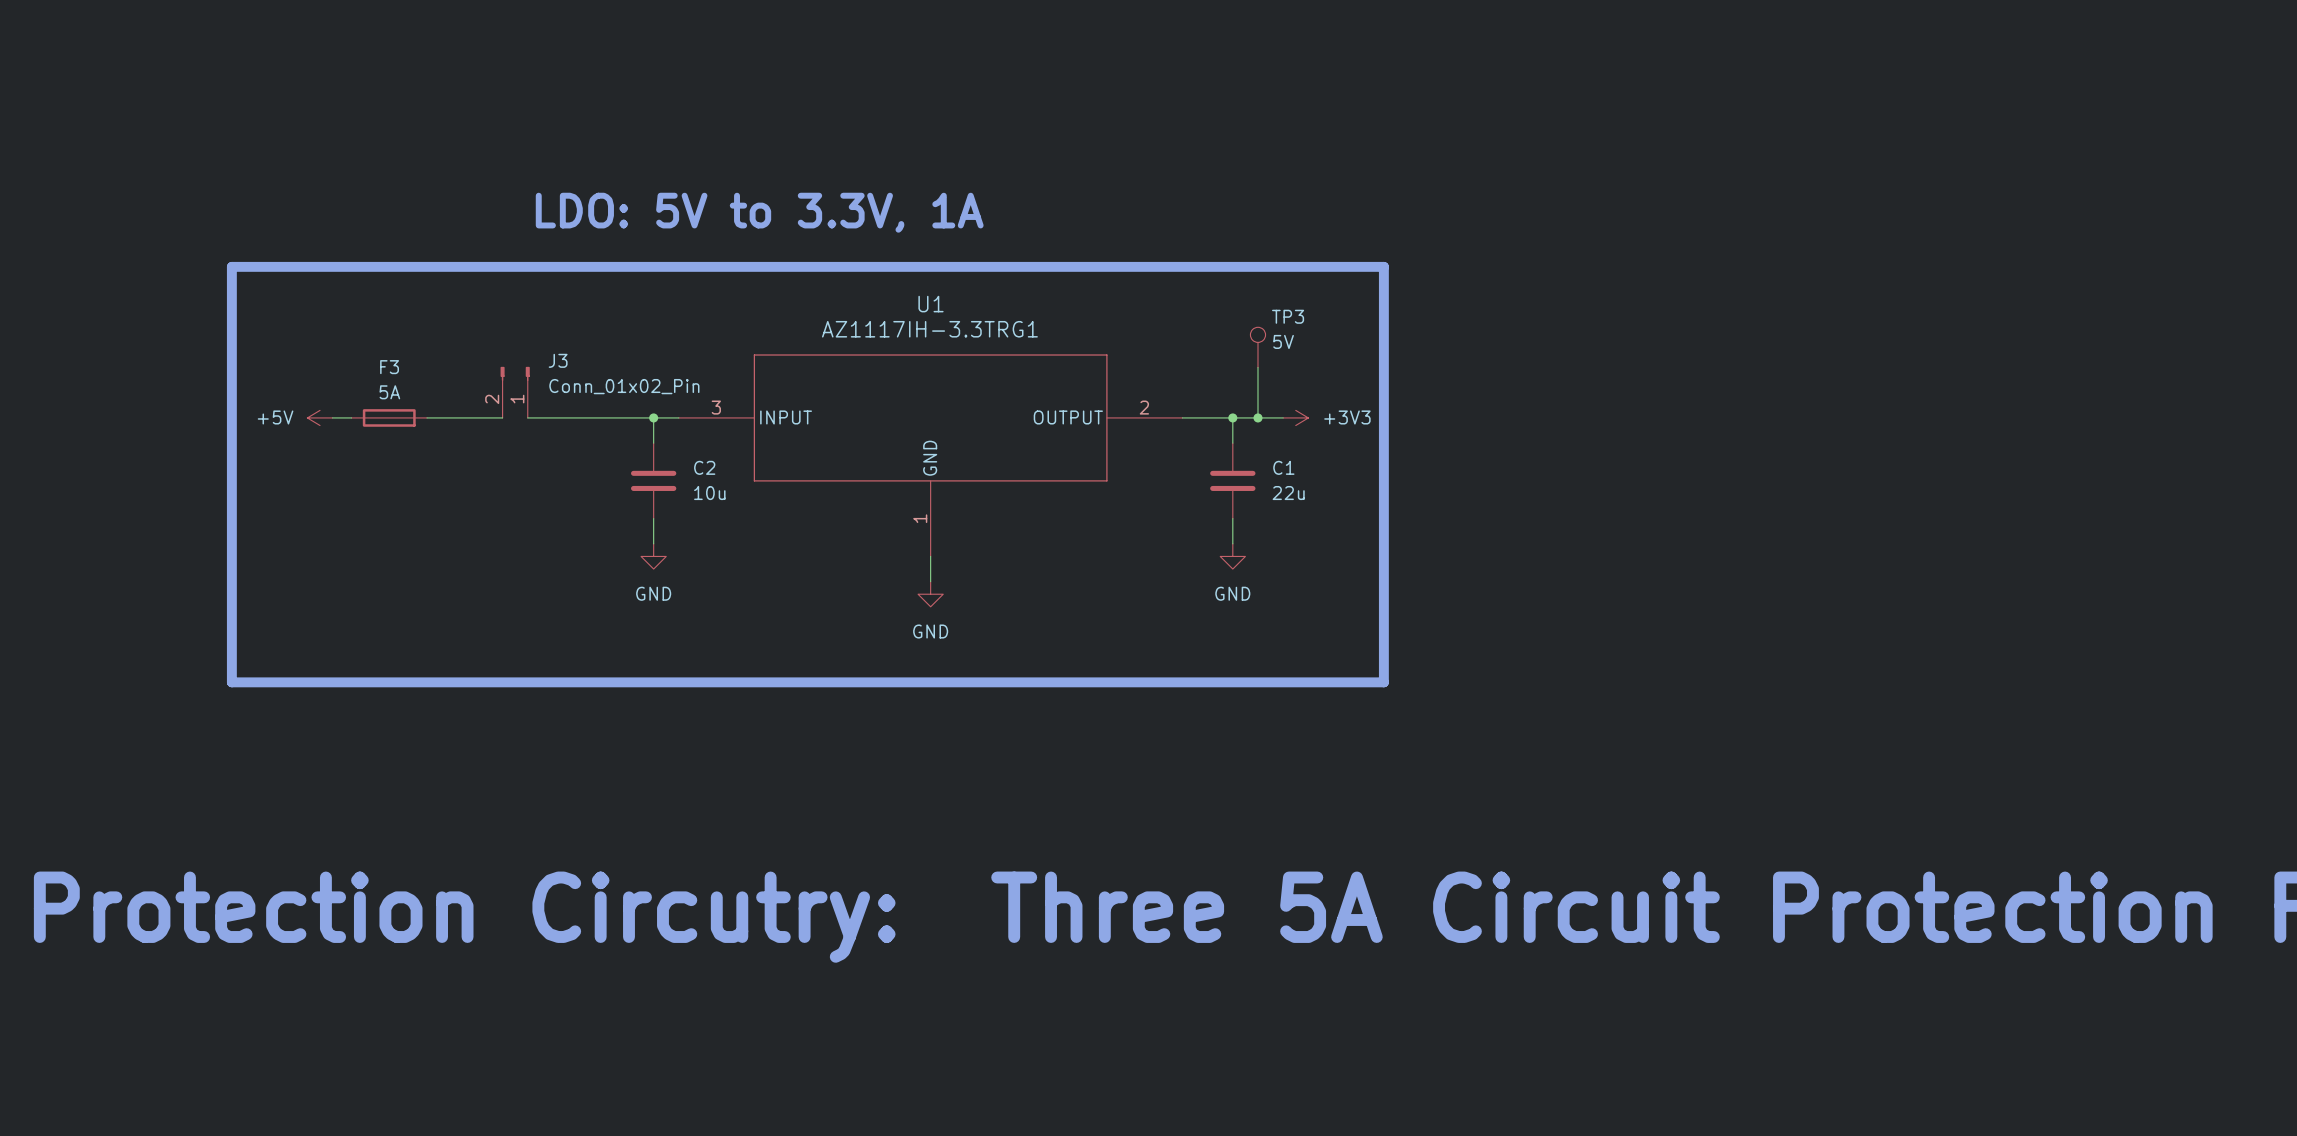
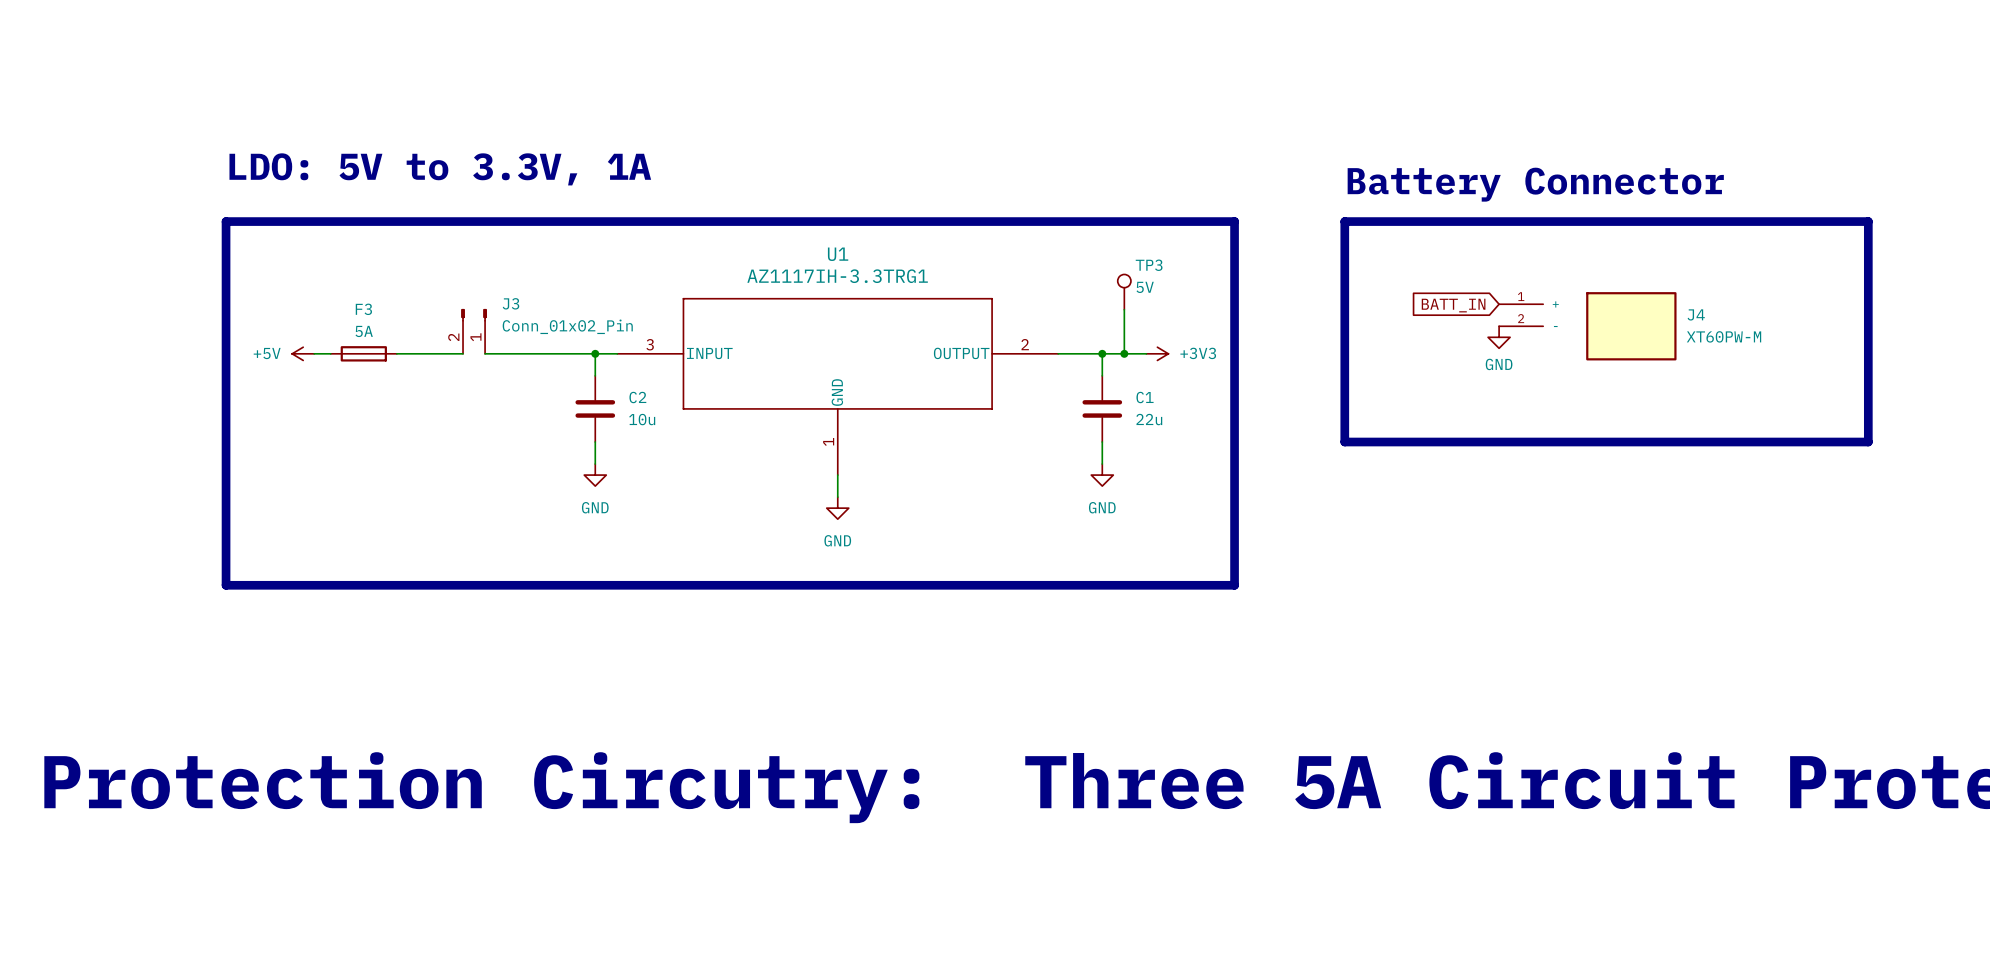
text: none -> LDO: 5V to 3.3V, 1A (440, 169)
text: LDO: 5V to 3.3V, 1A (759, 212) -> none
text: none -> Battery Connector (1535, 184)
line: none -> (1344, 221) (1868, 221) (1868, 442) (1344, 442) (1344, 221)
global label: none -> BATT_IN (1453, 305)
J4: none -> XT60PW-M (1587, 326)
power symbol: none -> GND (1499, 337)

